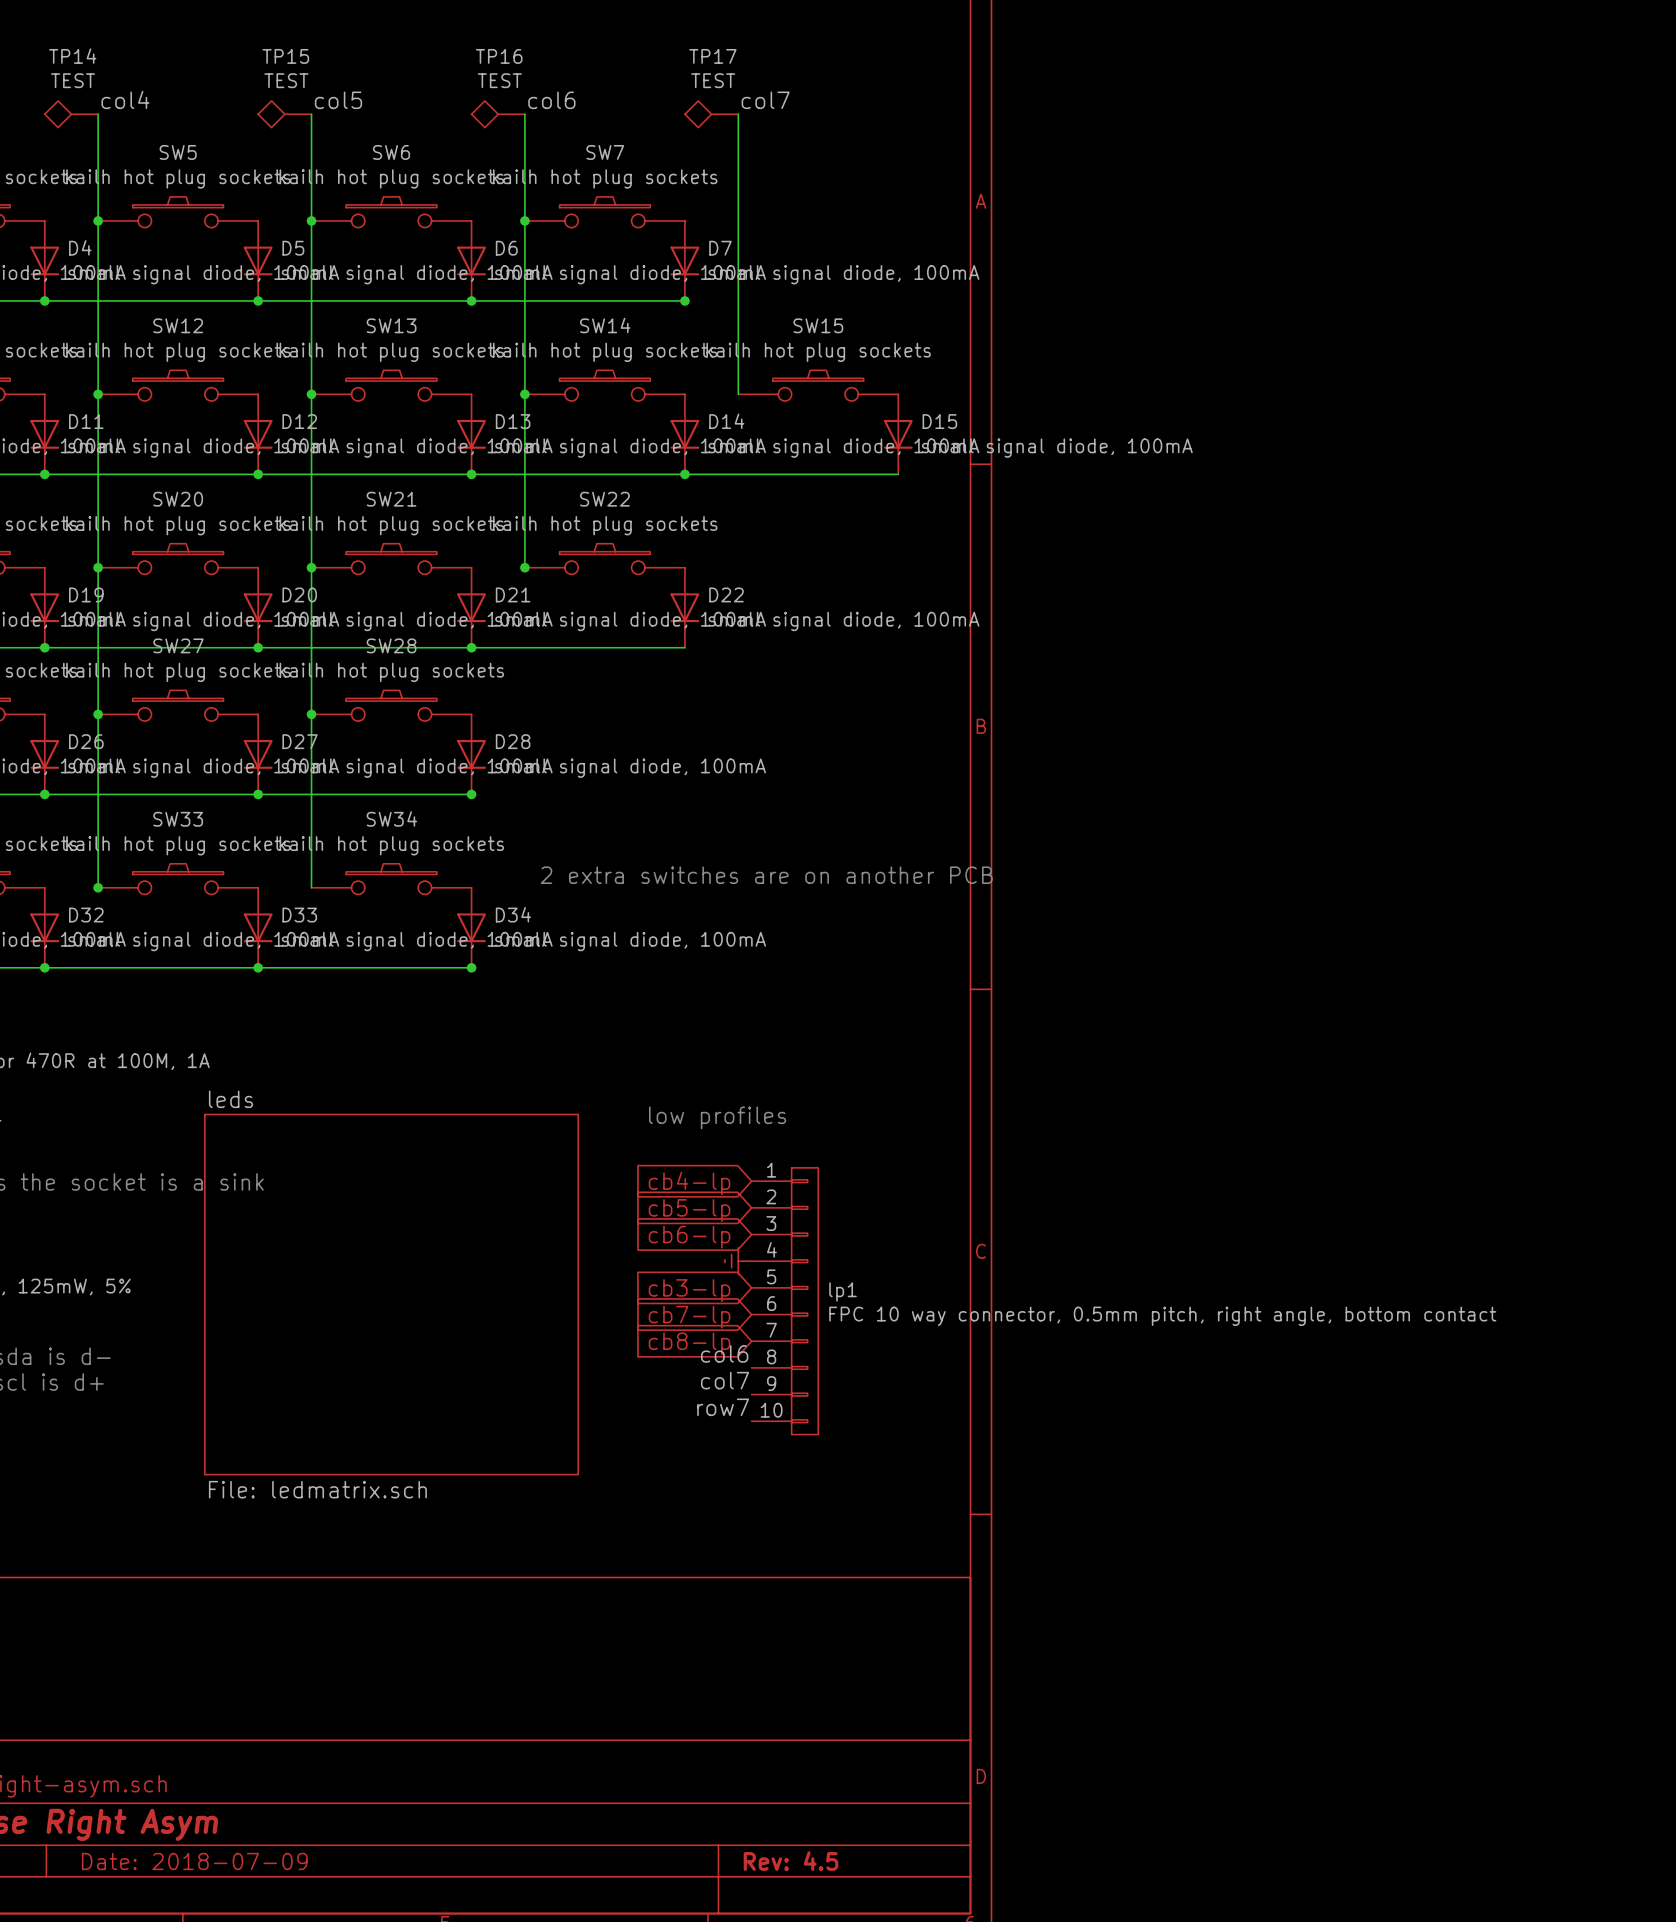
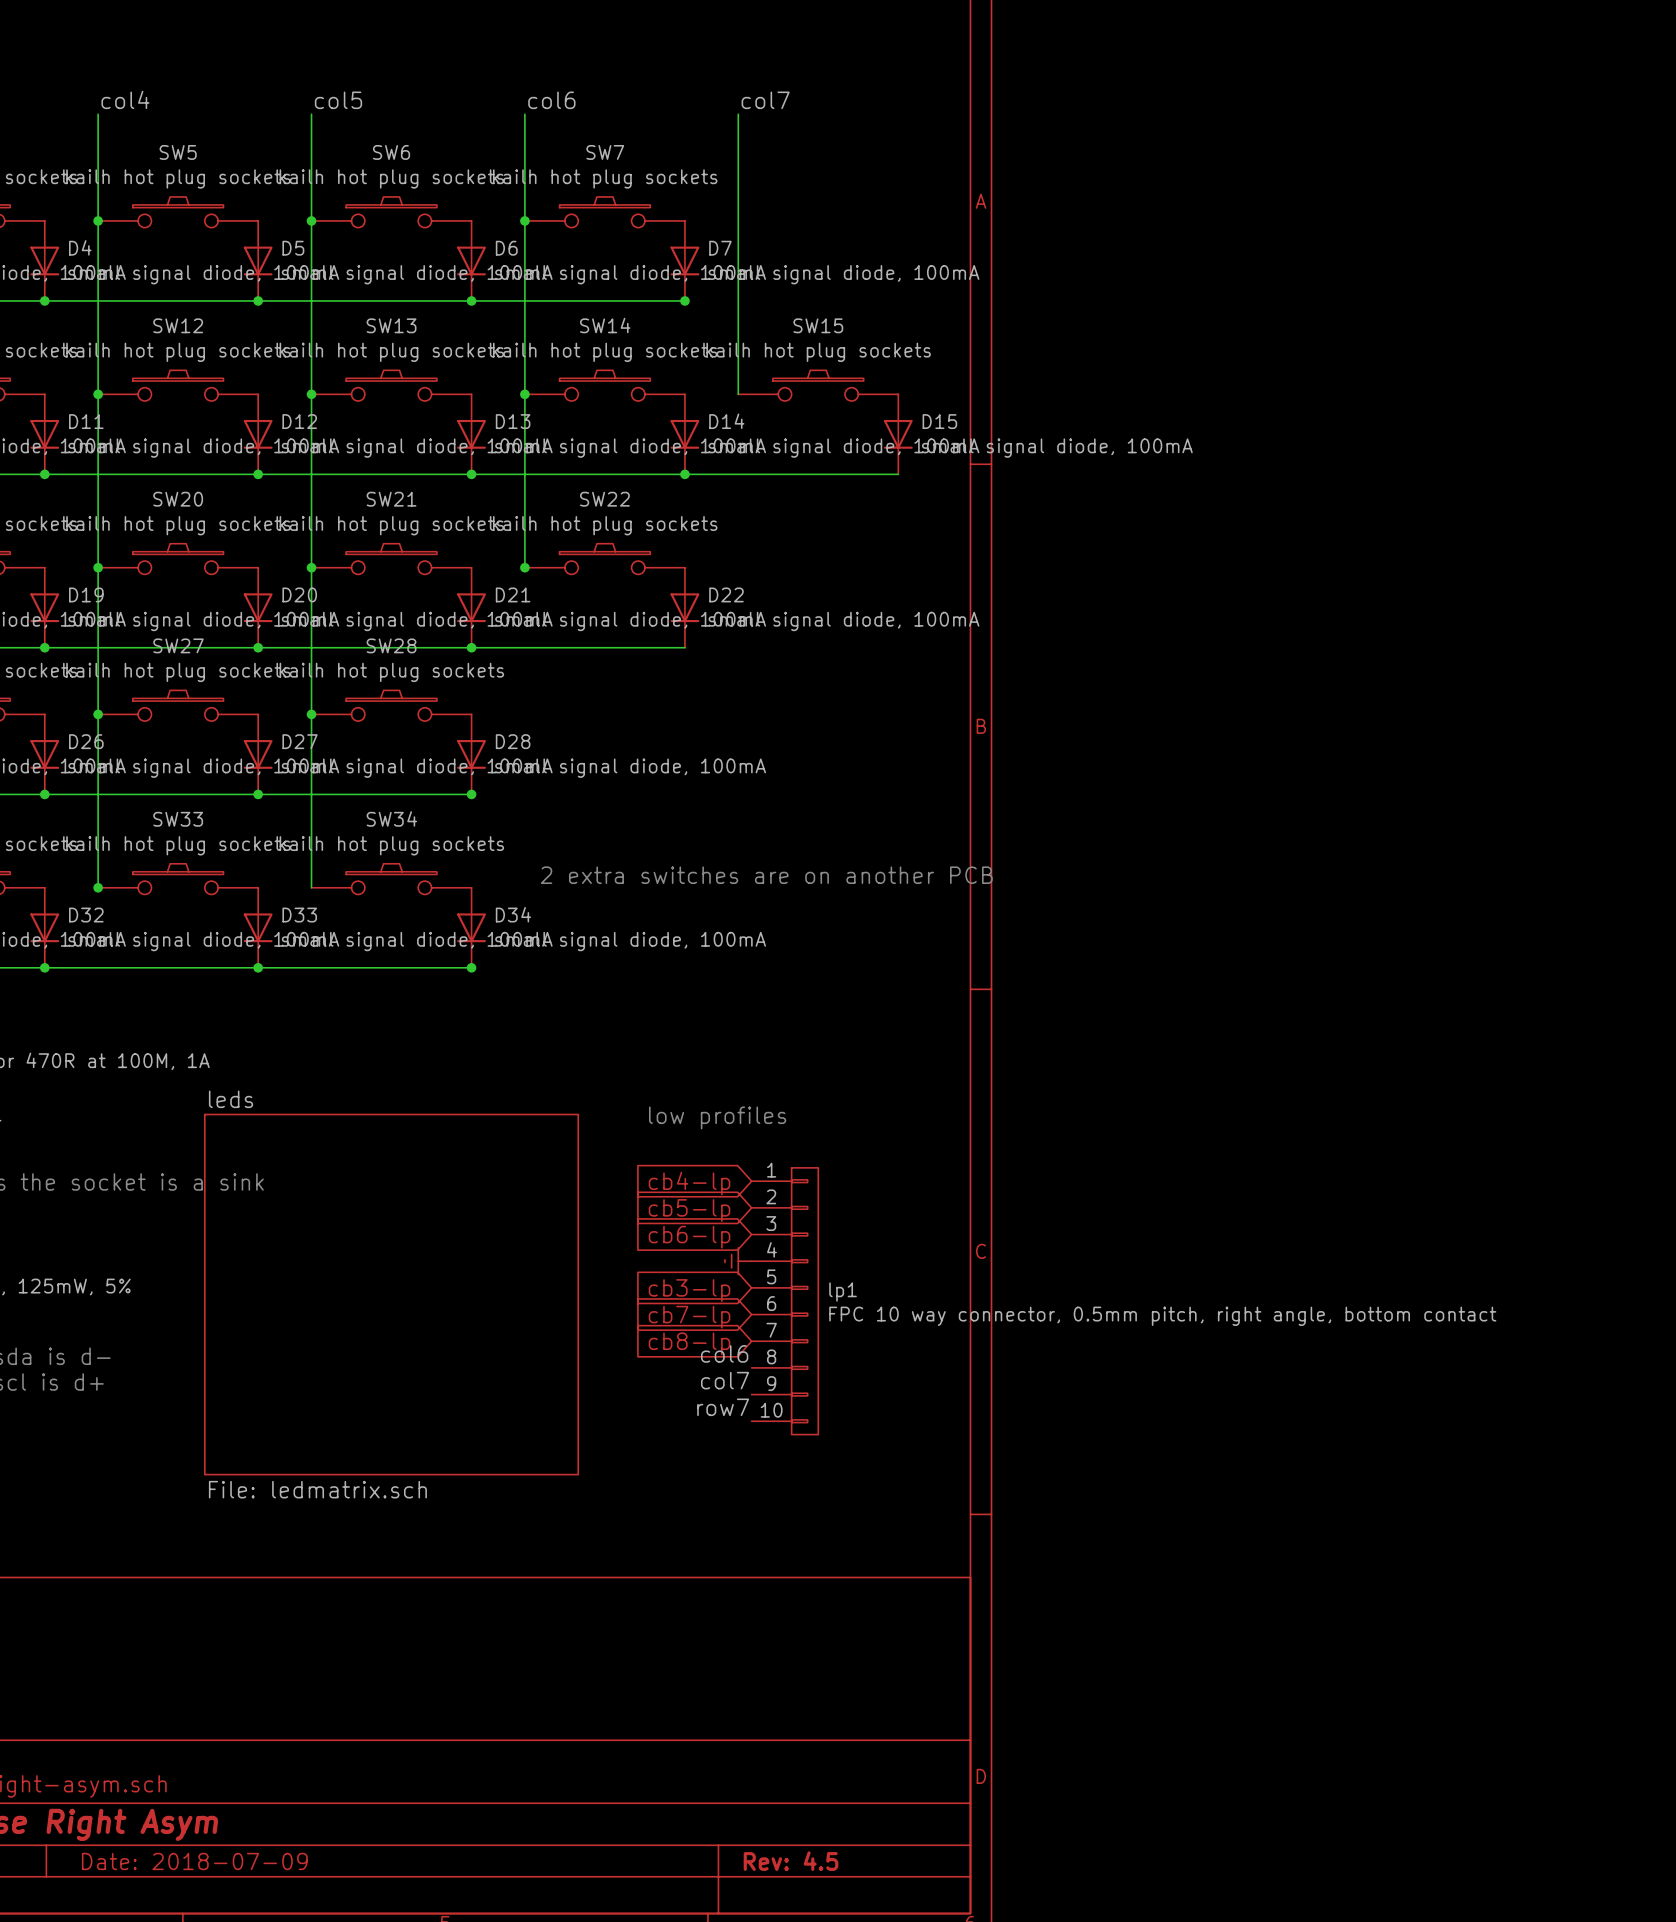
TP14: TEST (71, 114) -> none
TP15: TEST (284, 114) -> none
TP16: TEST (498, 114) -> none
TP17: TEST (711, 114) -> none

